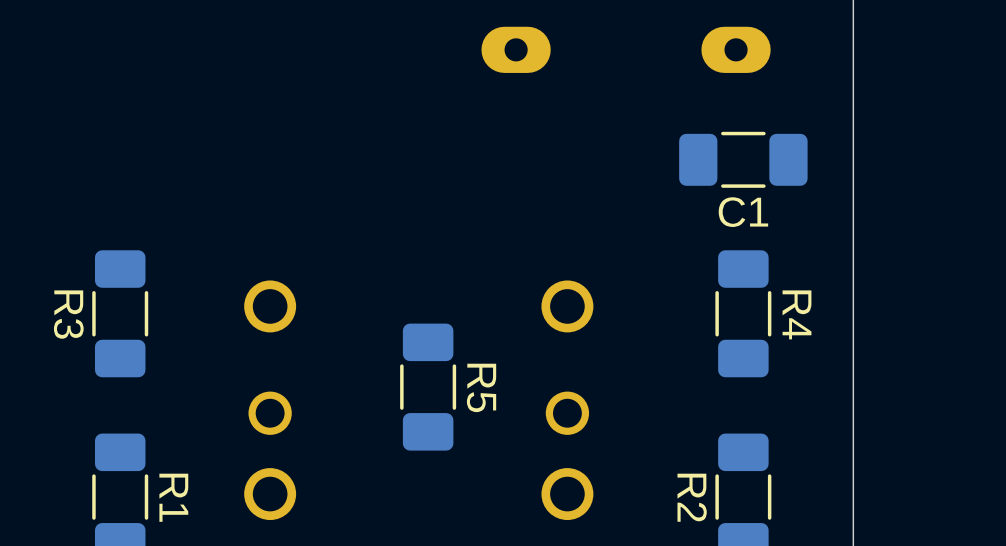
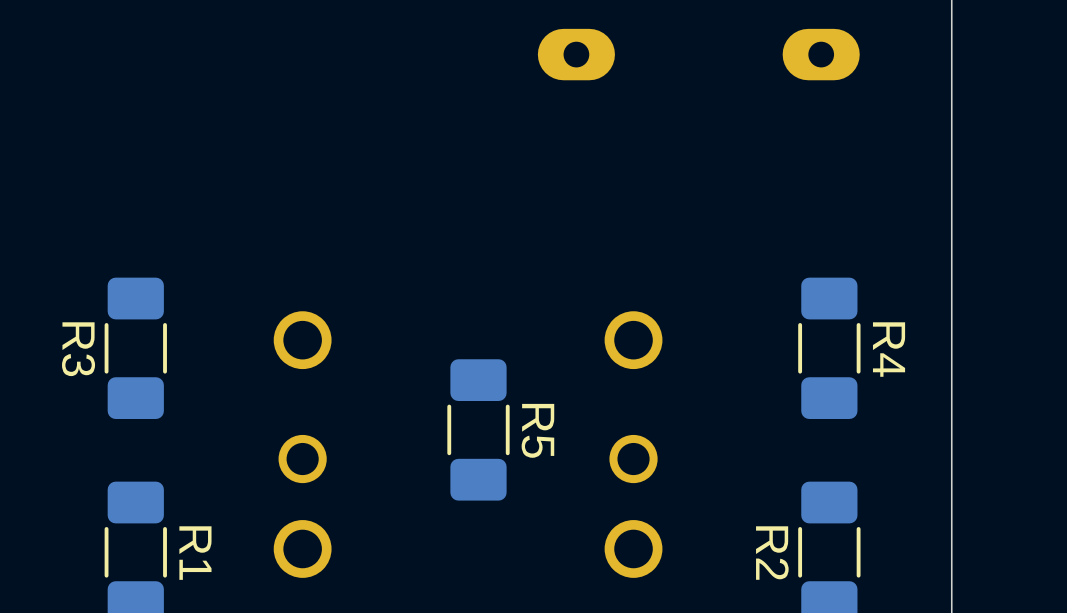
C1: (743, 159) -> none

